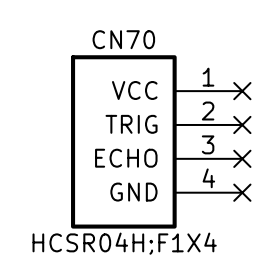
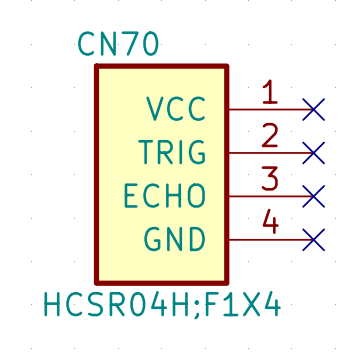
CN70 name position: CN70 (123, 39) -> CN70 (118, 43)

